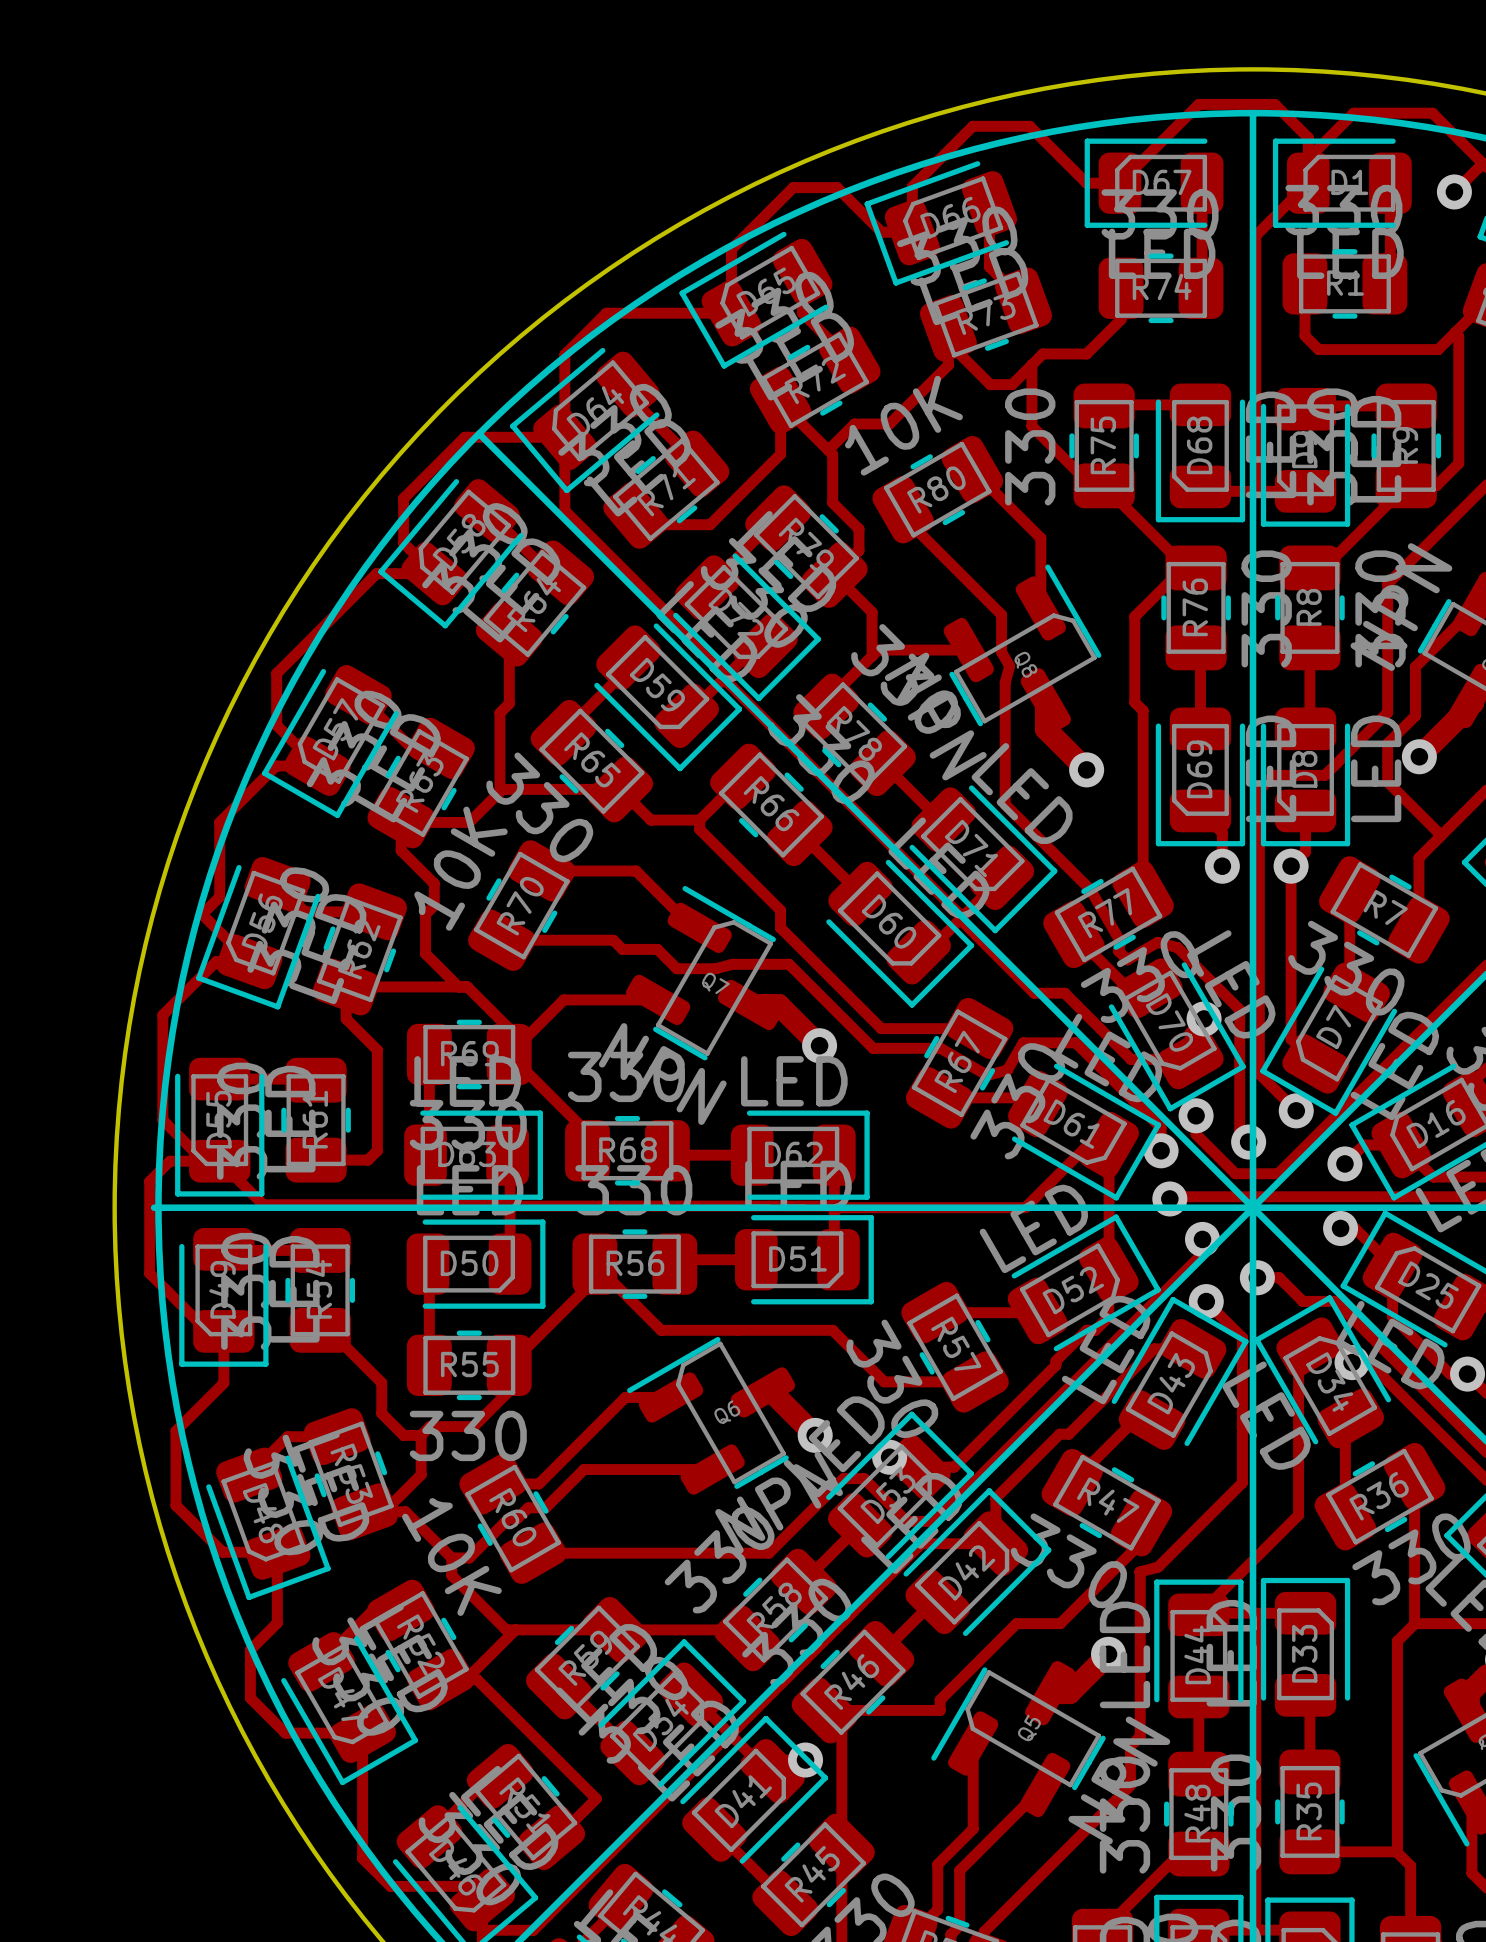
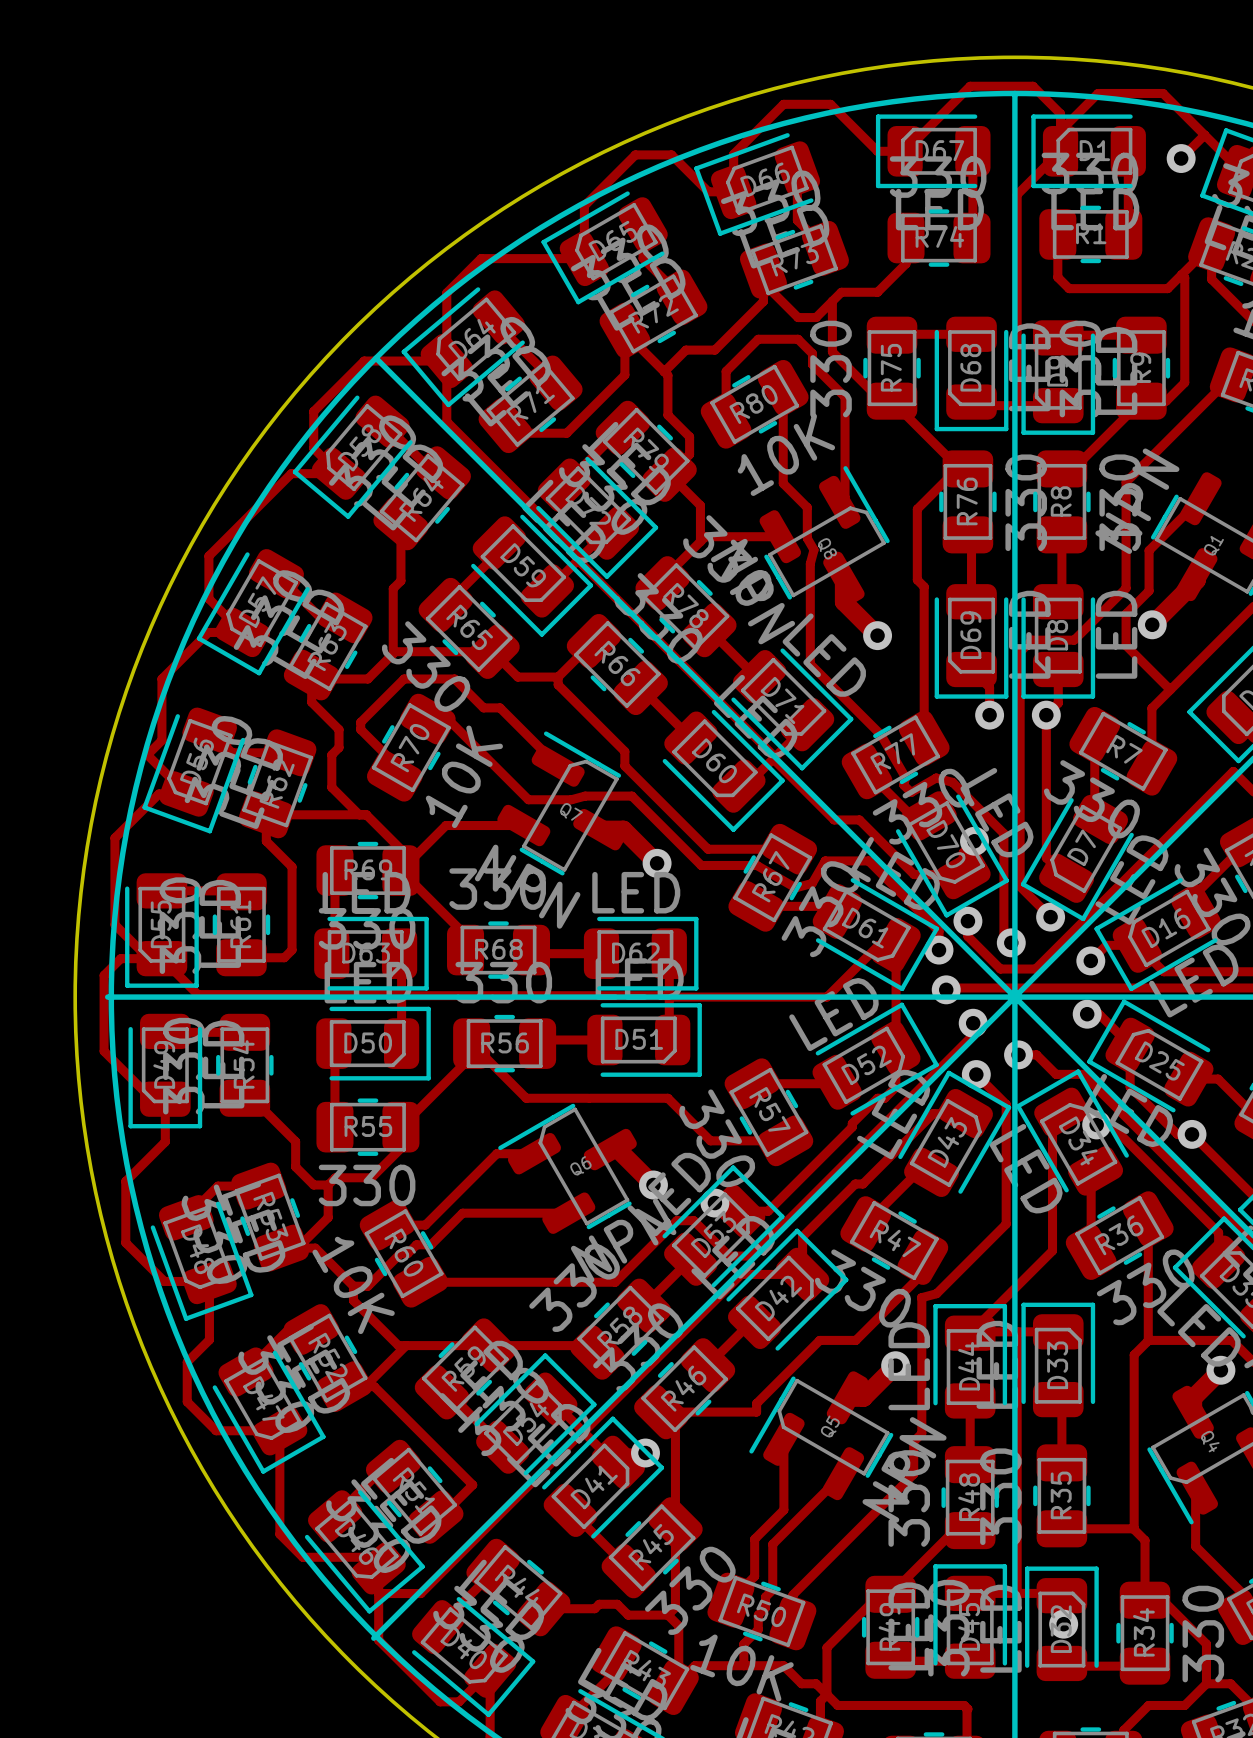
R80 value position: 10K (903, 425) -> 10K (786, 454)
track: (972, 469) (1040, 538) (1040, 608) -> (783, 387) (783, 483)
track: (903, 509) (903, 516) (972, 585) -> (726, 420) (726, 371) (758, 339) (798, 339) (812, 353) (812, 364) (845, 397) (845, 497) (839, 502)
R70 value position: 10K (461, 868) -> 10K (464, 776)
track: (566, 871) (636, 871) (692, 927) (699, 927) -> (447, 719) (528, 799) (539, 799)
track: (501, 940) (613, 940) (622, 949) (657, 949) (676, 968) -> (394, 776) (394, 763) (360, 729) (360, 722) (404, 679) (454, 679) (483, 707) (500, 707) (558, 766)

